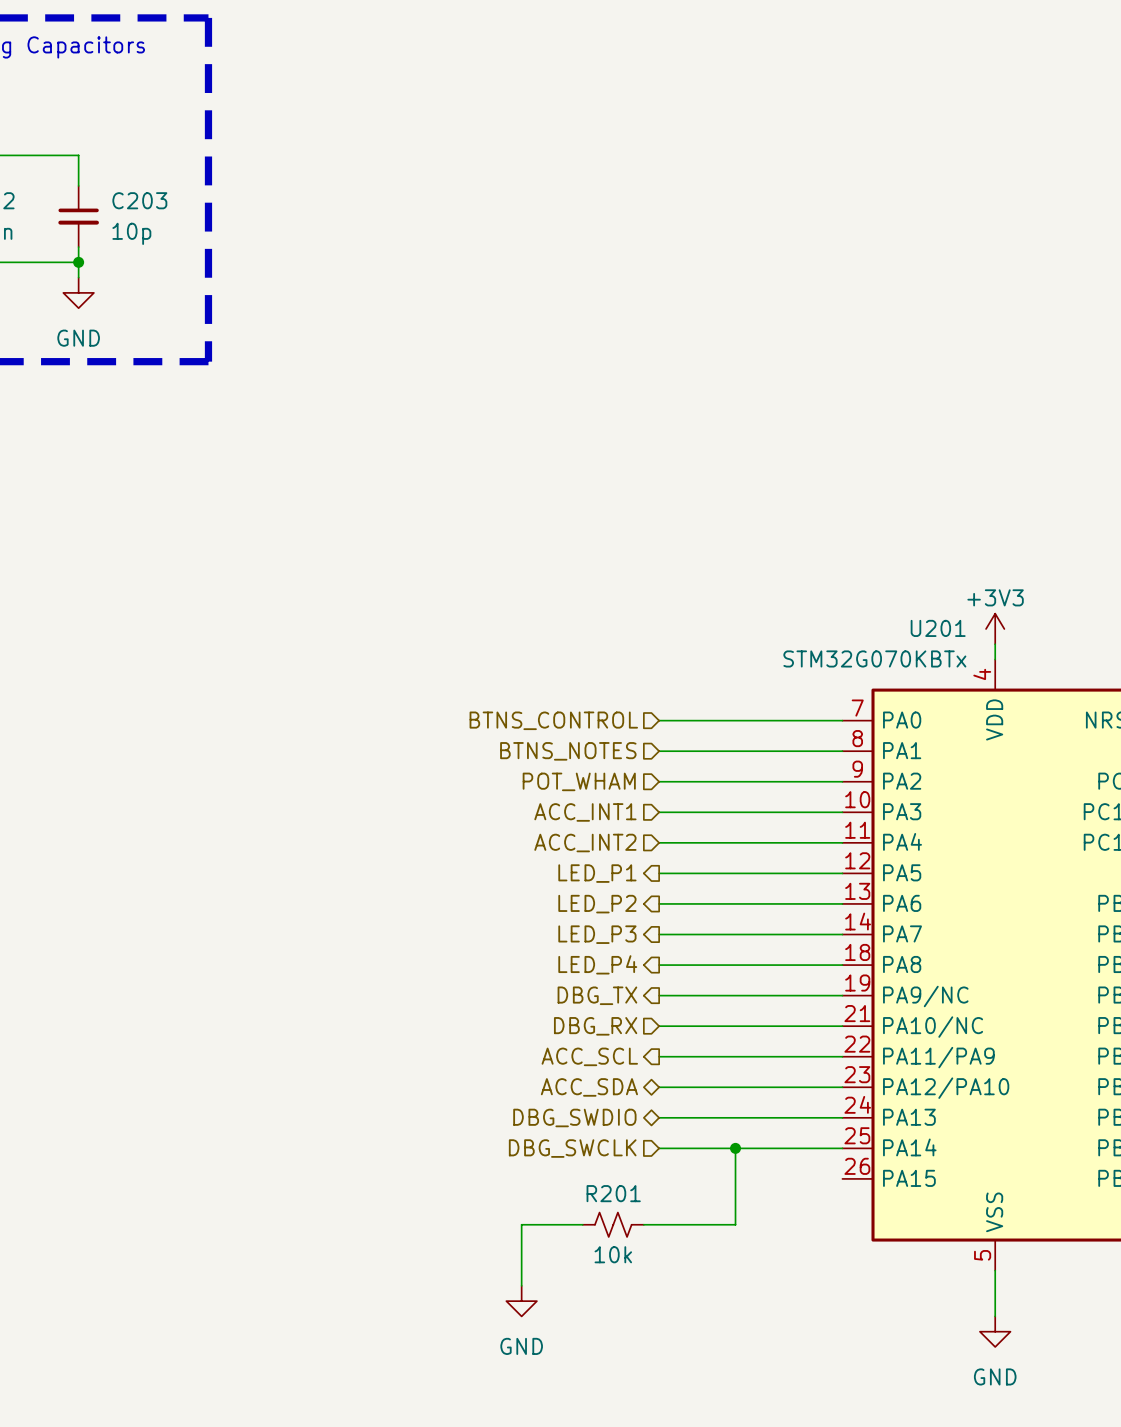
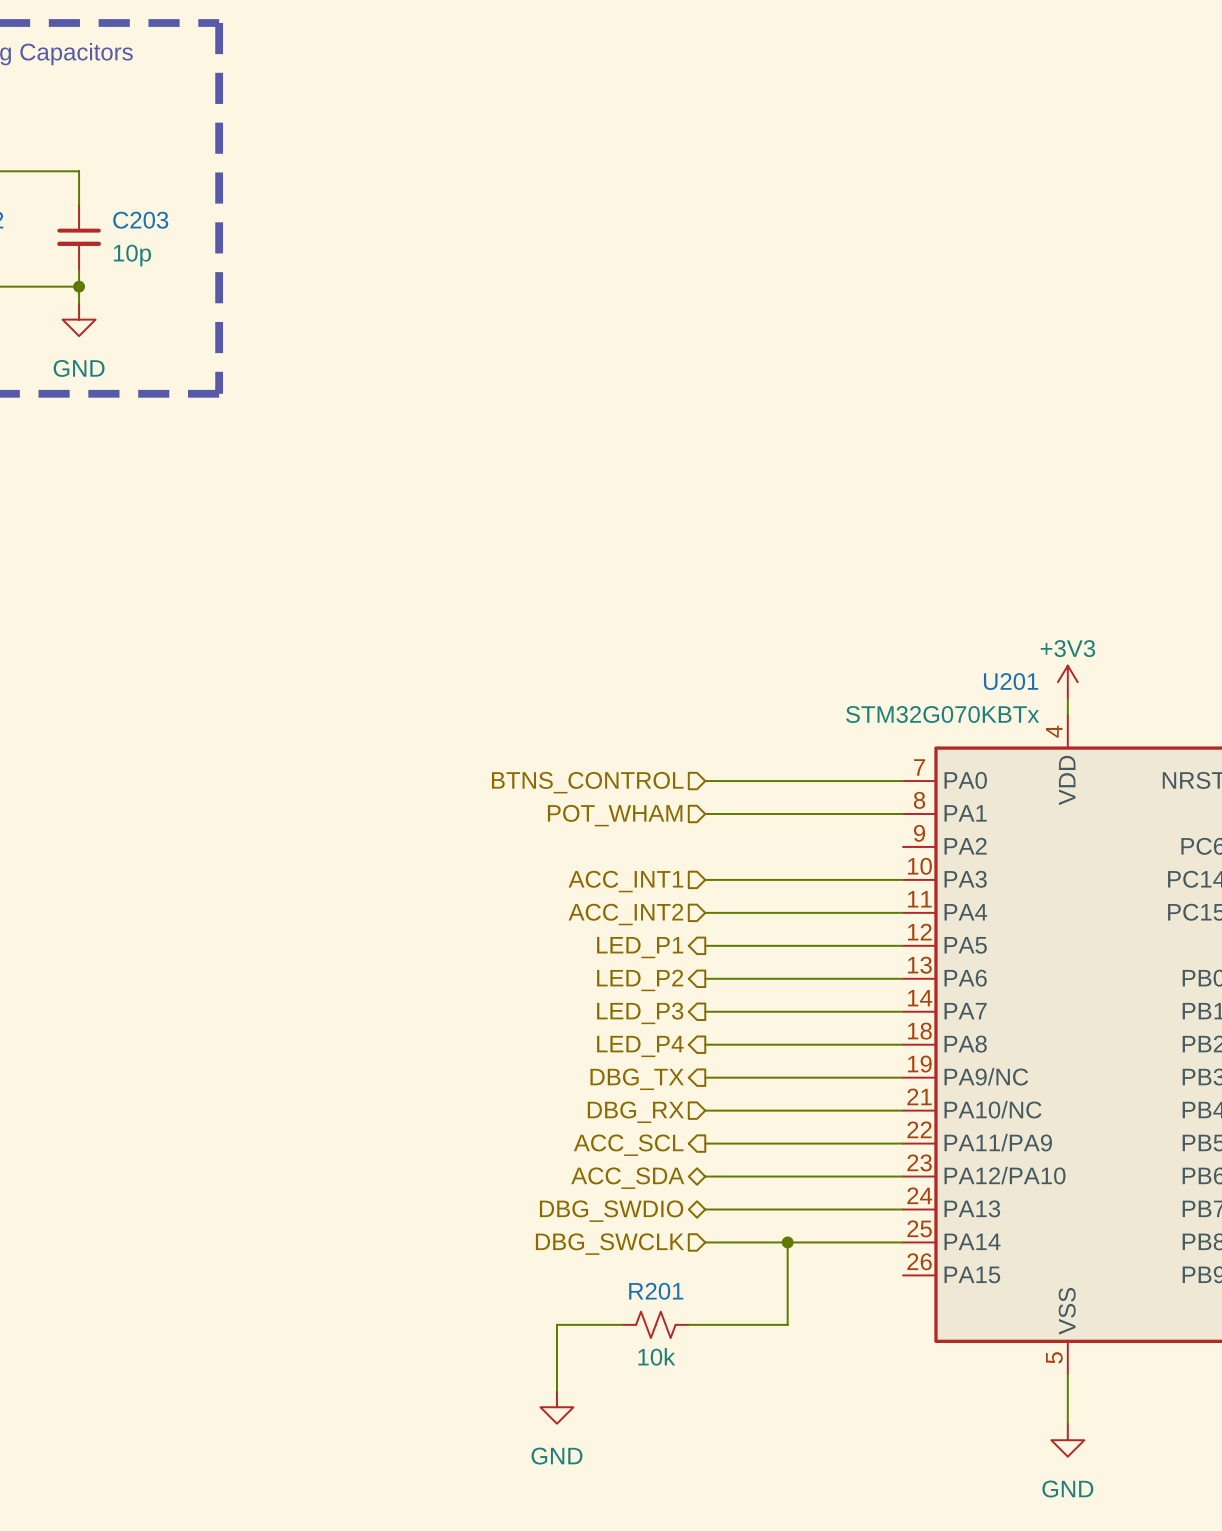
hierarchical label: BTNS_NOTES (568, 751) -> POT_WHAM (615, 815)
hierarchical label: POT_WHAM (579, 781) -> none
wire: (659, 781) (842, 781) -> none

